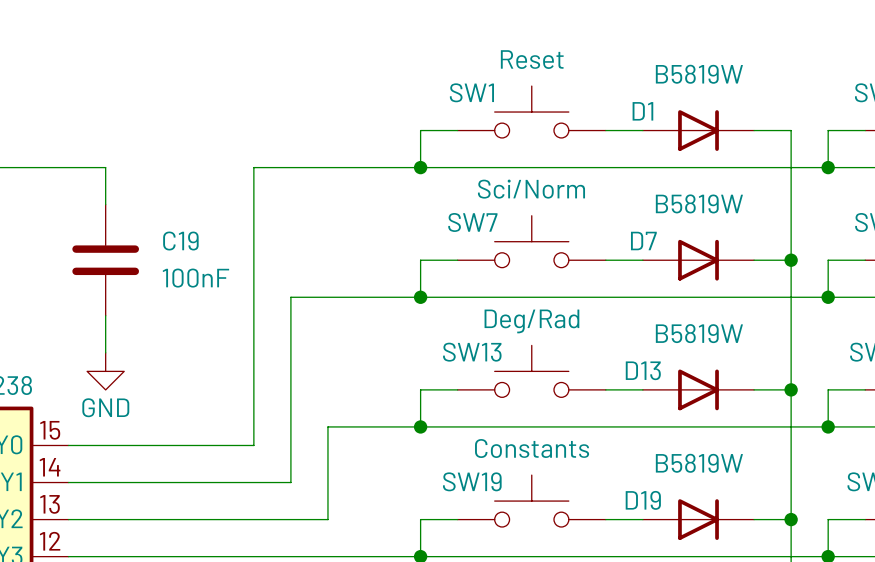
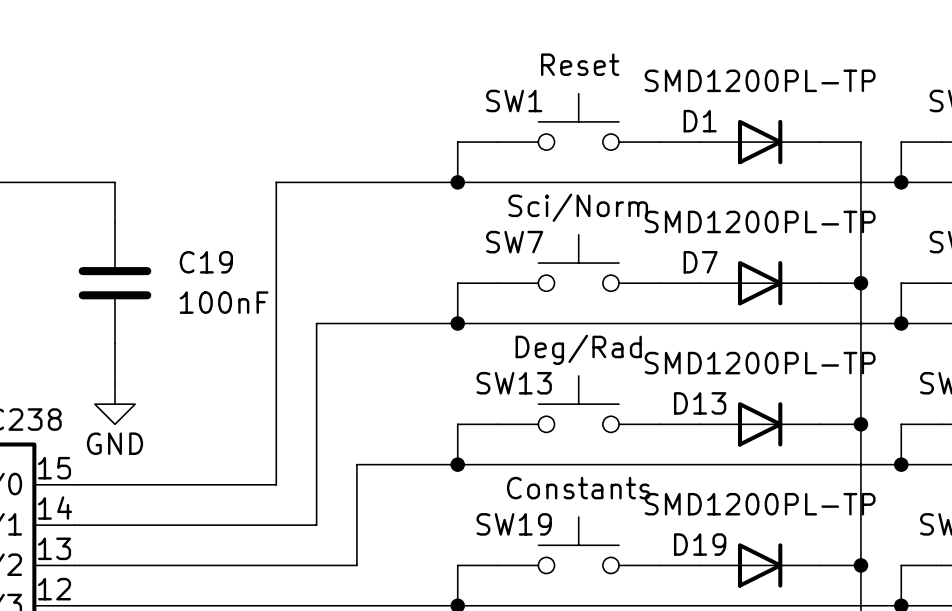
D1 value: B5819W (699, 74) -> SMD1200PL-TP (760, 80)
D7 value: B5819W (699, 203) -> SMD1200PL-TP (760, 221)
D13 value: B5819W (699, 333) -> SMD1200PL-TP (760, 363)
D19 value: B5819W (699, 463) -> SMD1200PL-TP (760, 504)

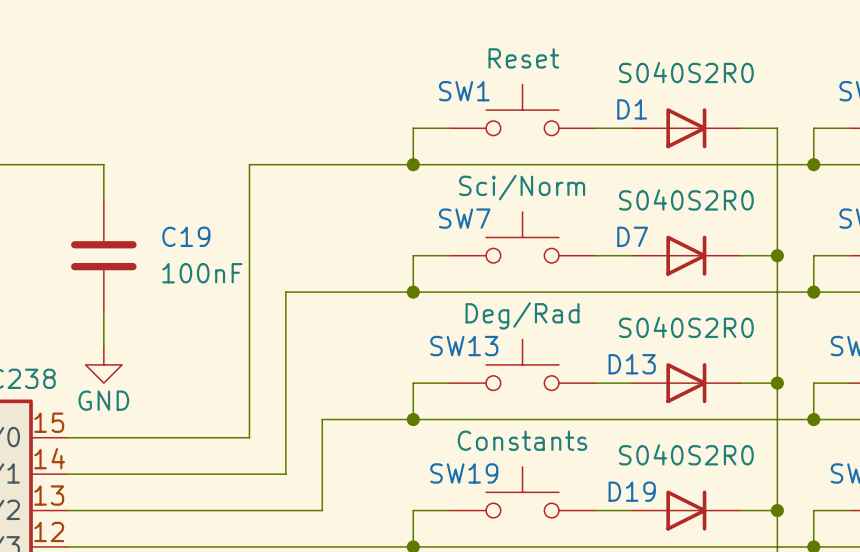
D1 value: SMD1200PL-TP (760, 80) -> S040S2R0 (686, 72)
D7 value: SMD1200PL-TP (760, 221) -> S040S2R0 (686, 199)
D13 value: SMD1200PL-TP (760, 363) -> S040S2R0 (686, 327)
D19 value: SMD1200PL-TP (760, 504) -> S040S2R0 (686, 454)

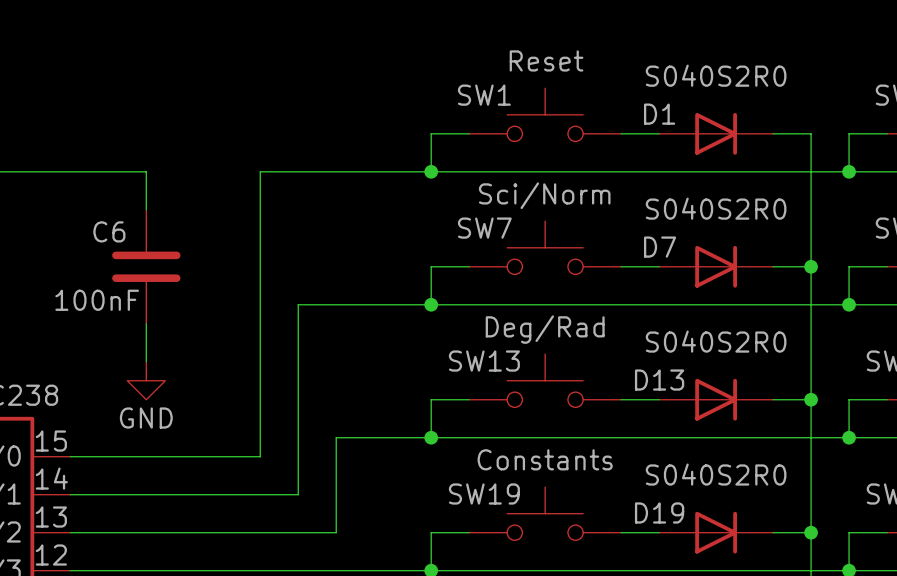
wire: (103, 164) (103, 201) -> (108, 171) (146, 171) (146, 209)
C19: 100nF (103, 255) -> none
C6: none -> 100nF (146, 266)
wire: (103, 310) (103, 346) -> (146, 323) (146, 361)
power symbol position: GND (103, 364) -> GND (146, 380)

